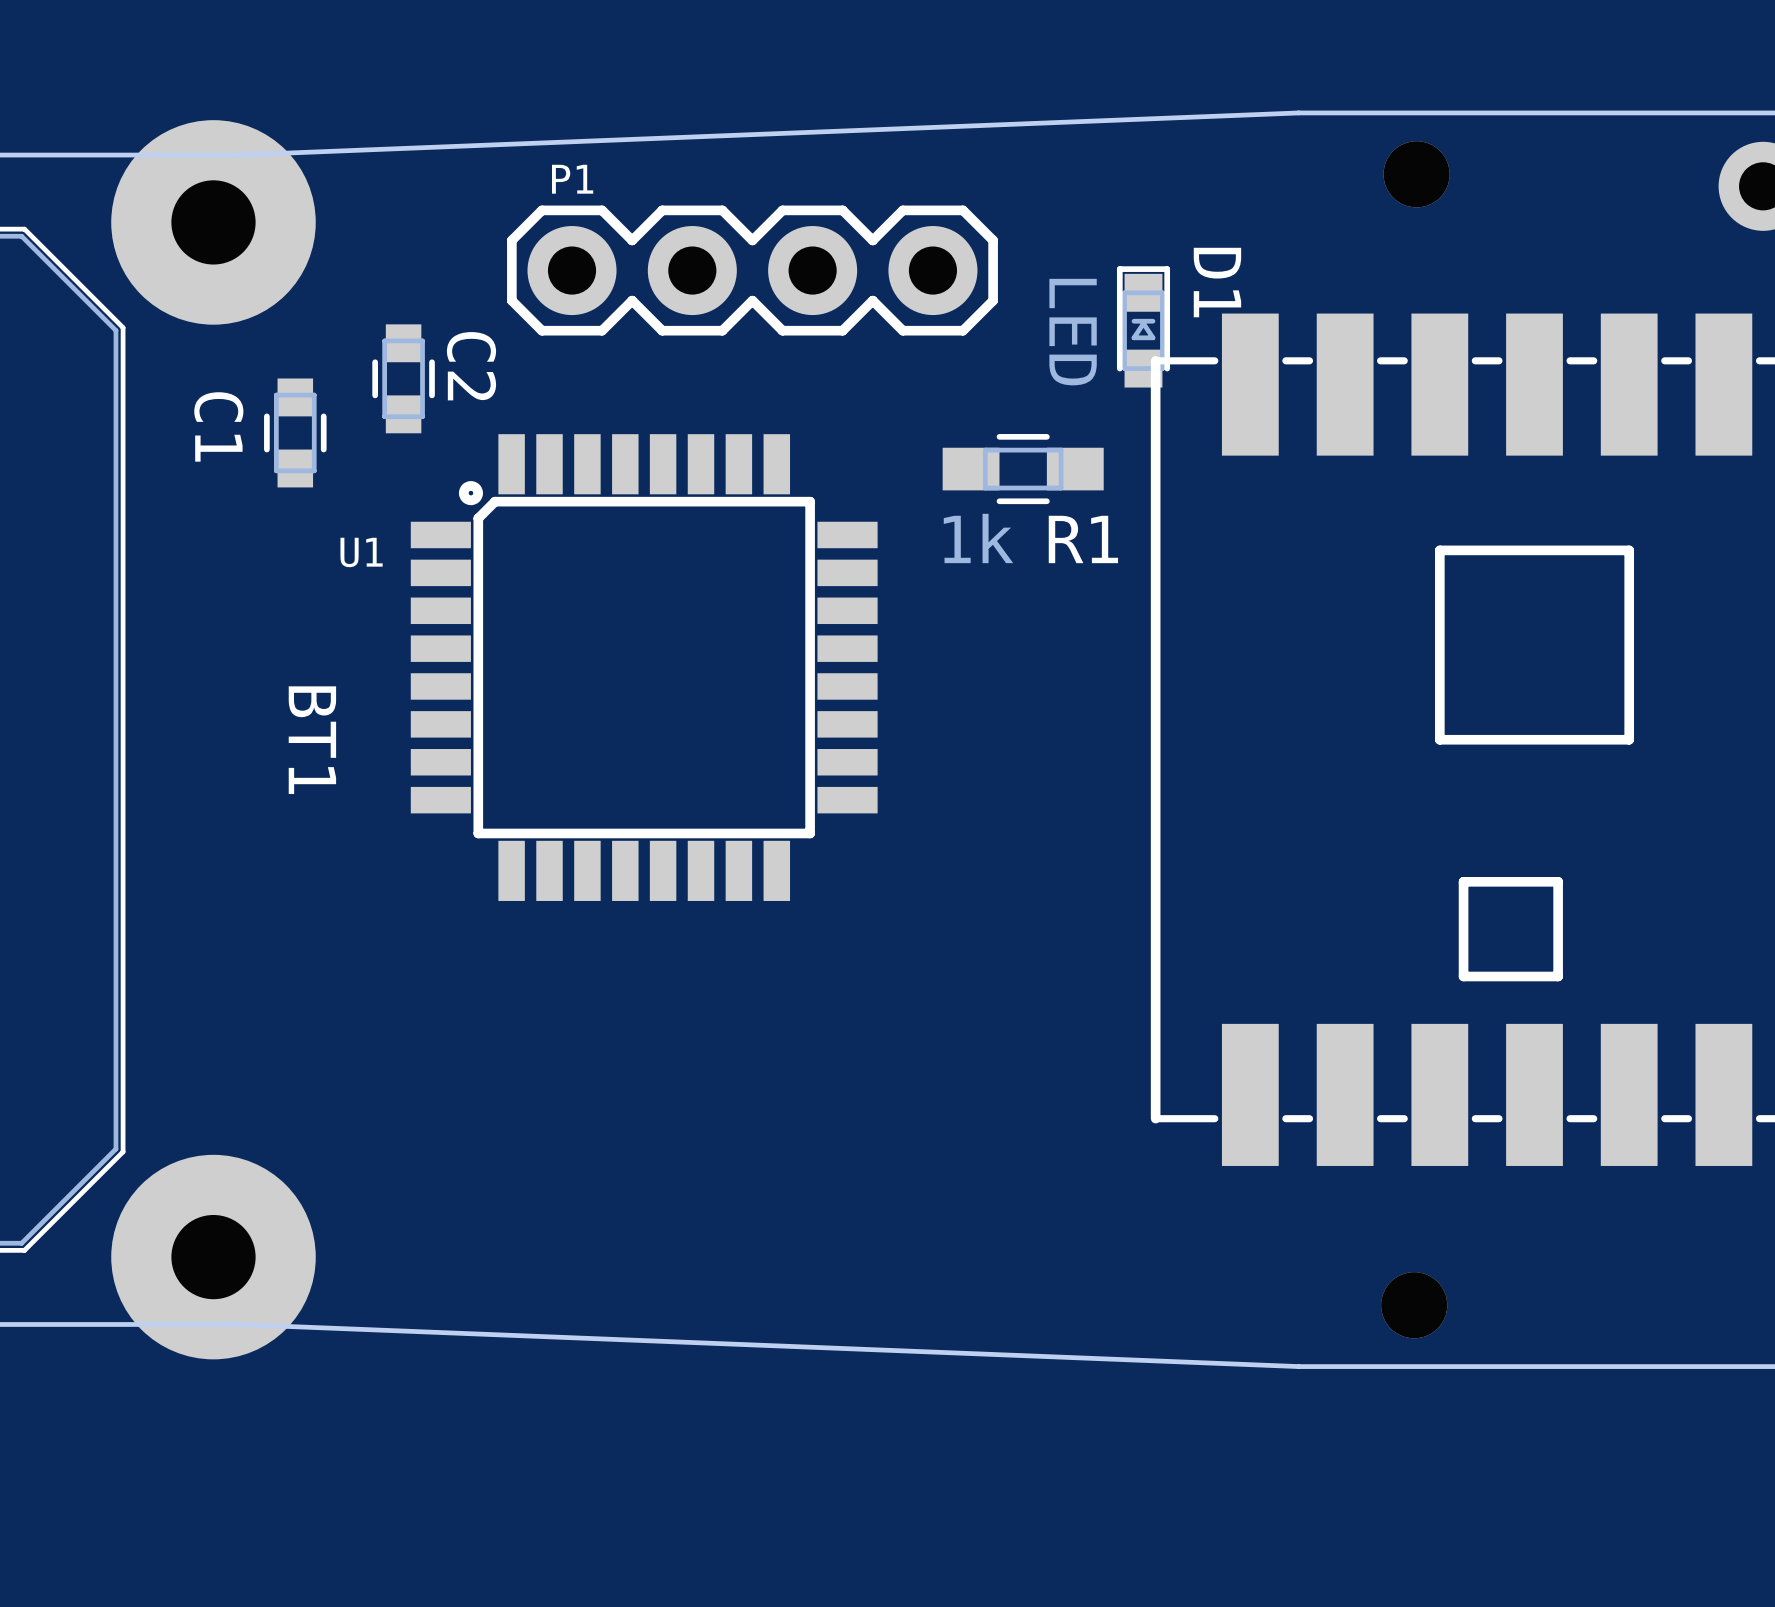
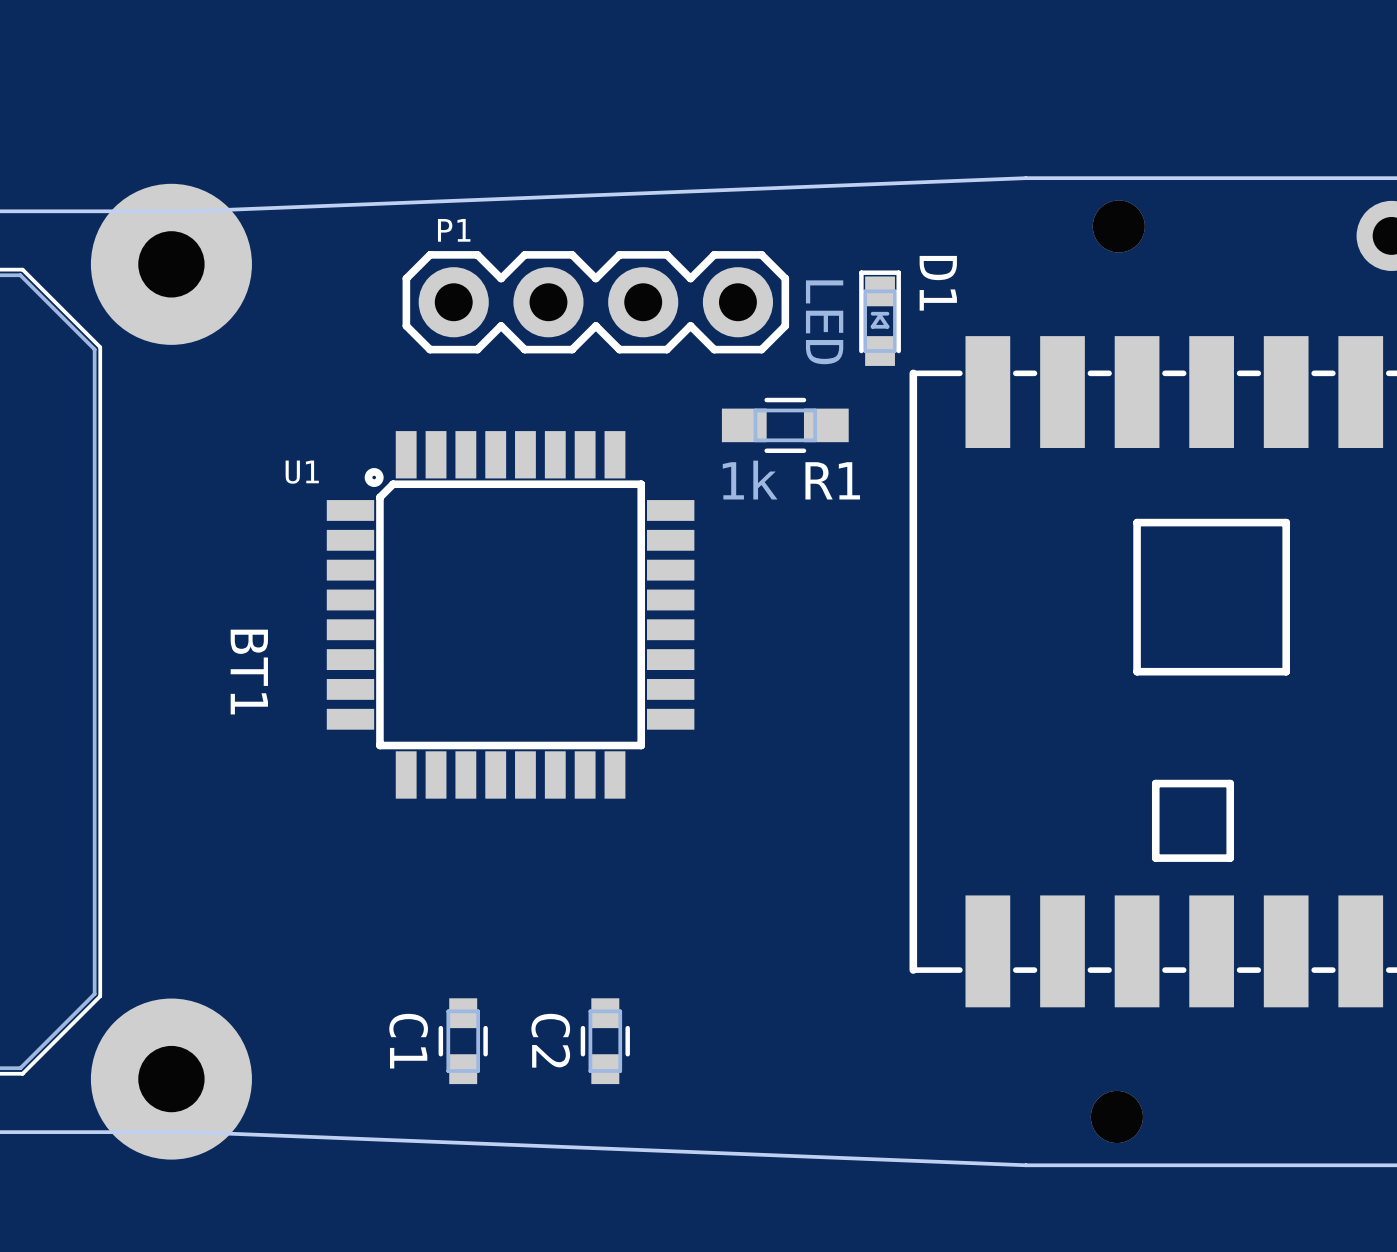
D1 position: (1143, 326) -> (880, 318)
C2 name position: C2 (471, 366) -> C2 (550, 1040)
C2 position: (403, 378) -> (605, 1041)
C1 name position: C1 (218, 426) -> C1 (408, 1041)
C1 position: (295, 432) -> (463, 1041)
R1 position: (1023, 469) -> (785, 425)
U1 name position: U1 (361, 552) -> U1 (302, 472)

